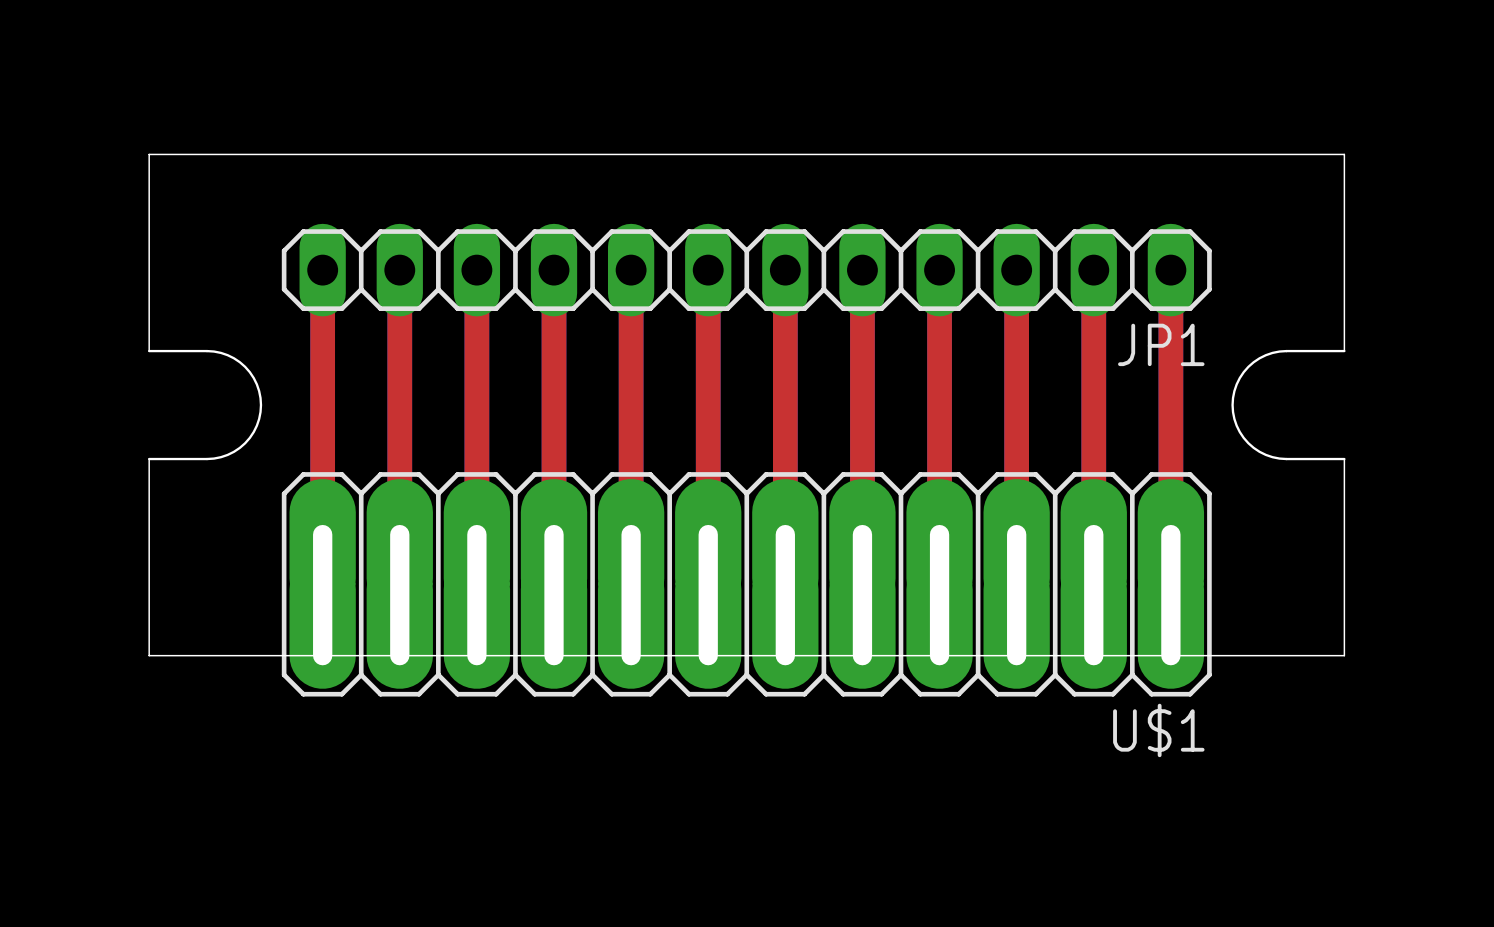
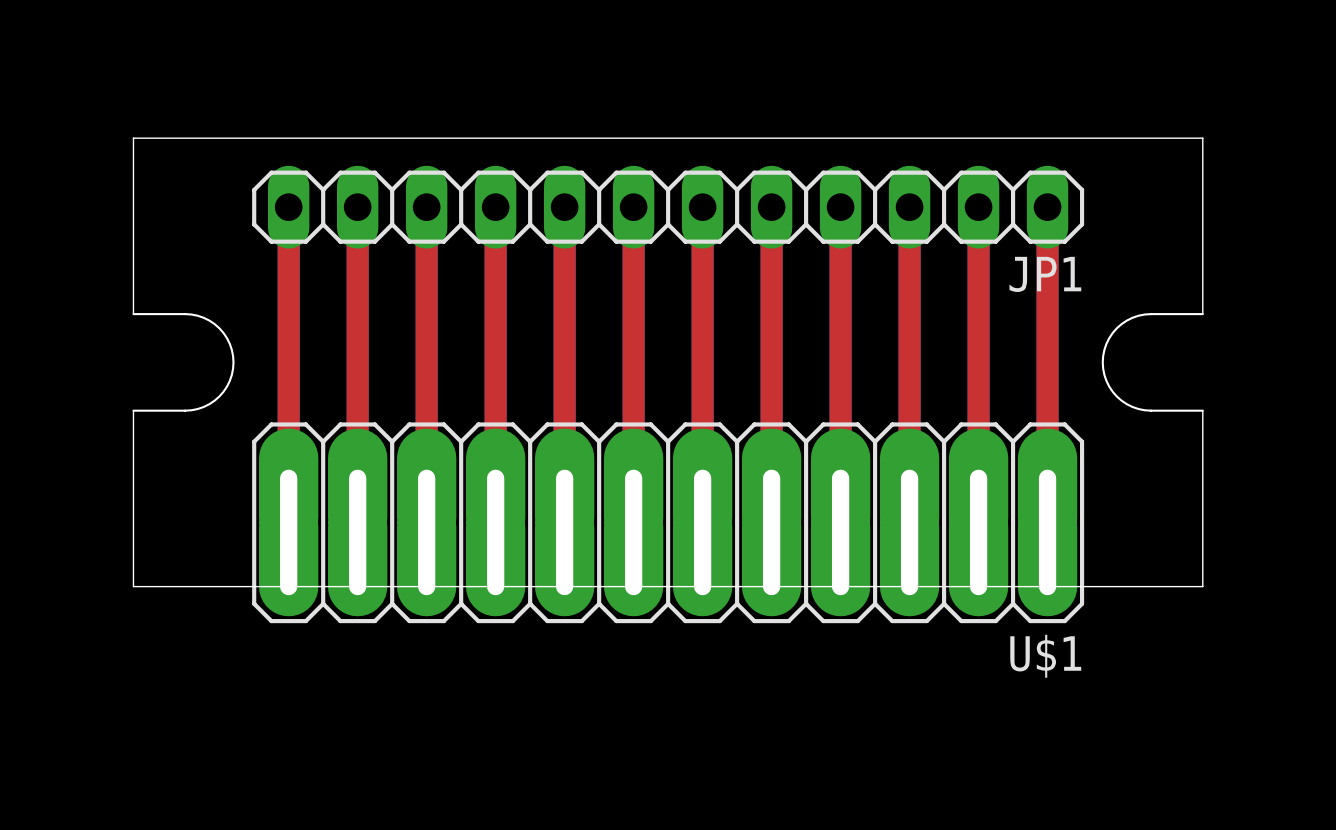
JP1 position: (746, 270) -> (668, 207)

